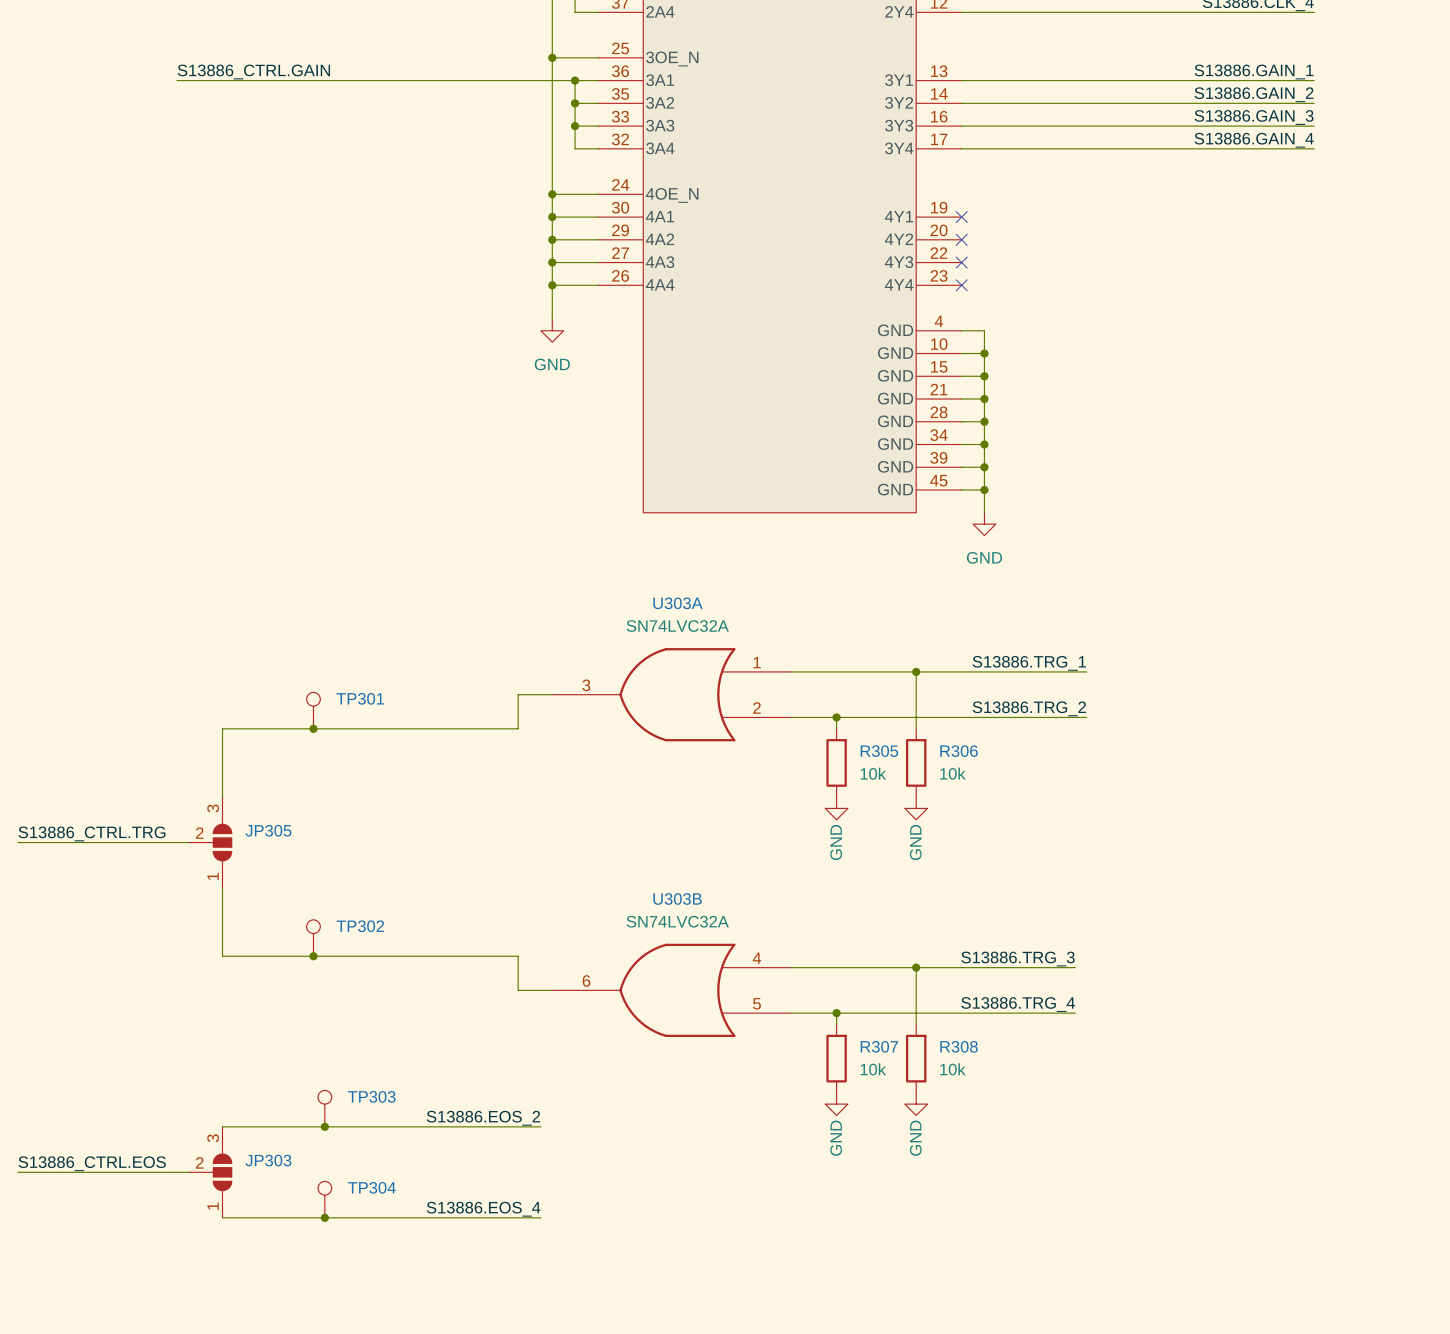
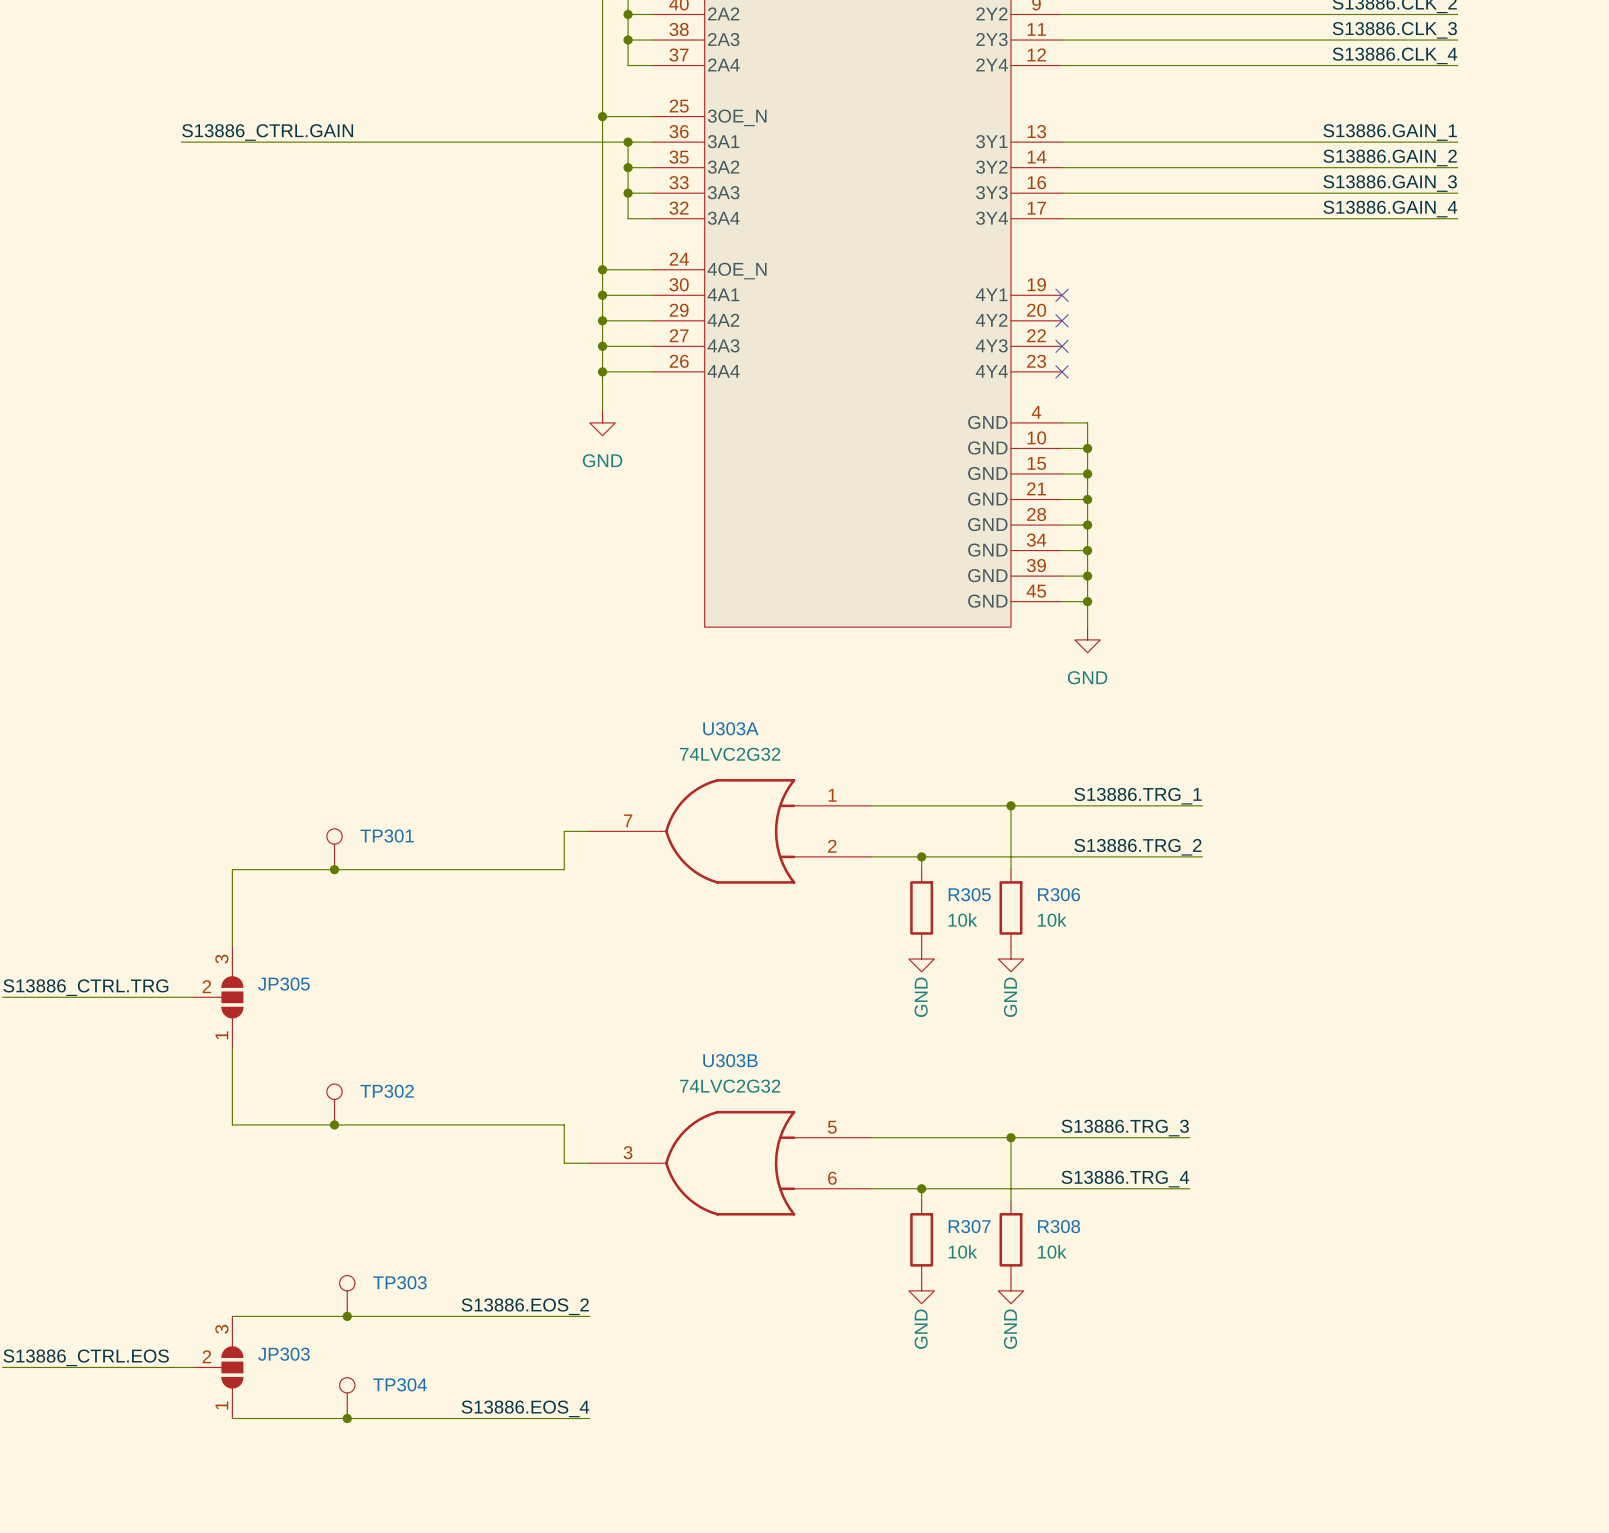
U303A value: SN74LVC32A (677, 626) -> 74LVC2G32 (730, 754)
U303A symbol: [552, 648, 792, 742] -> [589, 779, 871, 884]
U303B value: SN74LVC32A (677, 921) -> 74LVC2G32 (730, 1086)
U303B symbol: [552, 943, 792, 1038] -> [589, 1110, 871, 1216]

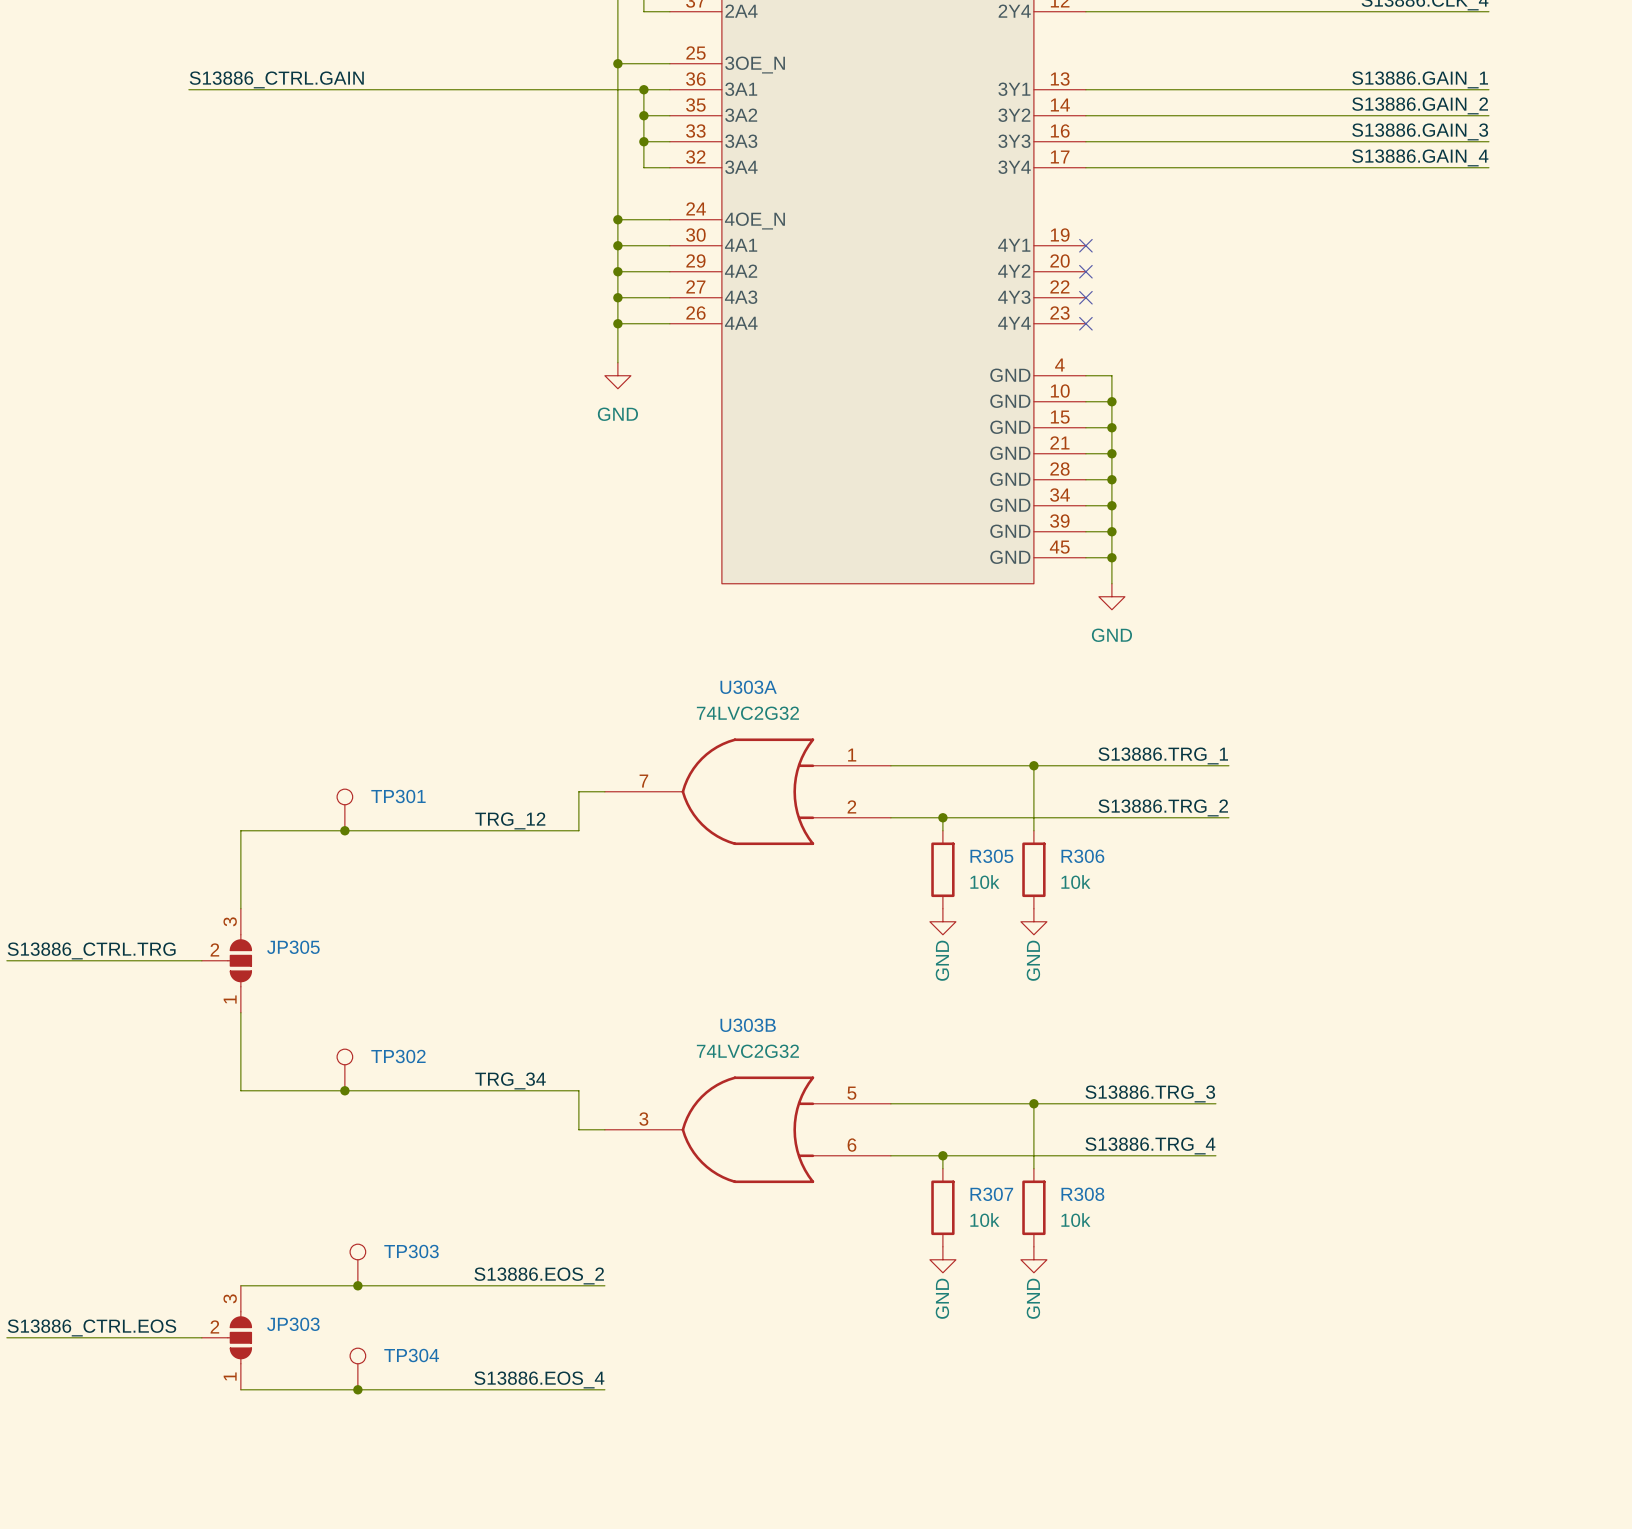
label: none -> TRG_12 (510, 820)
label: none -> TRG_34 (510, 1080)

